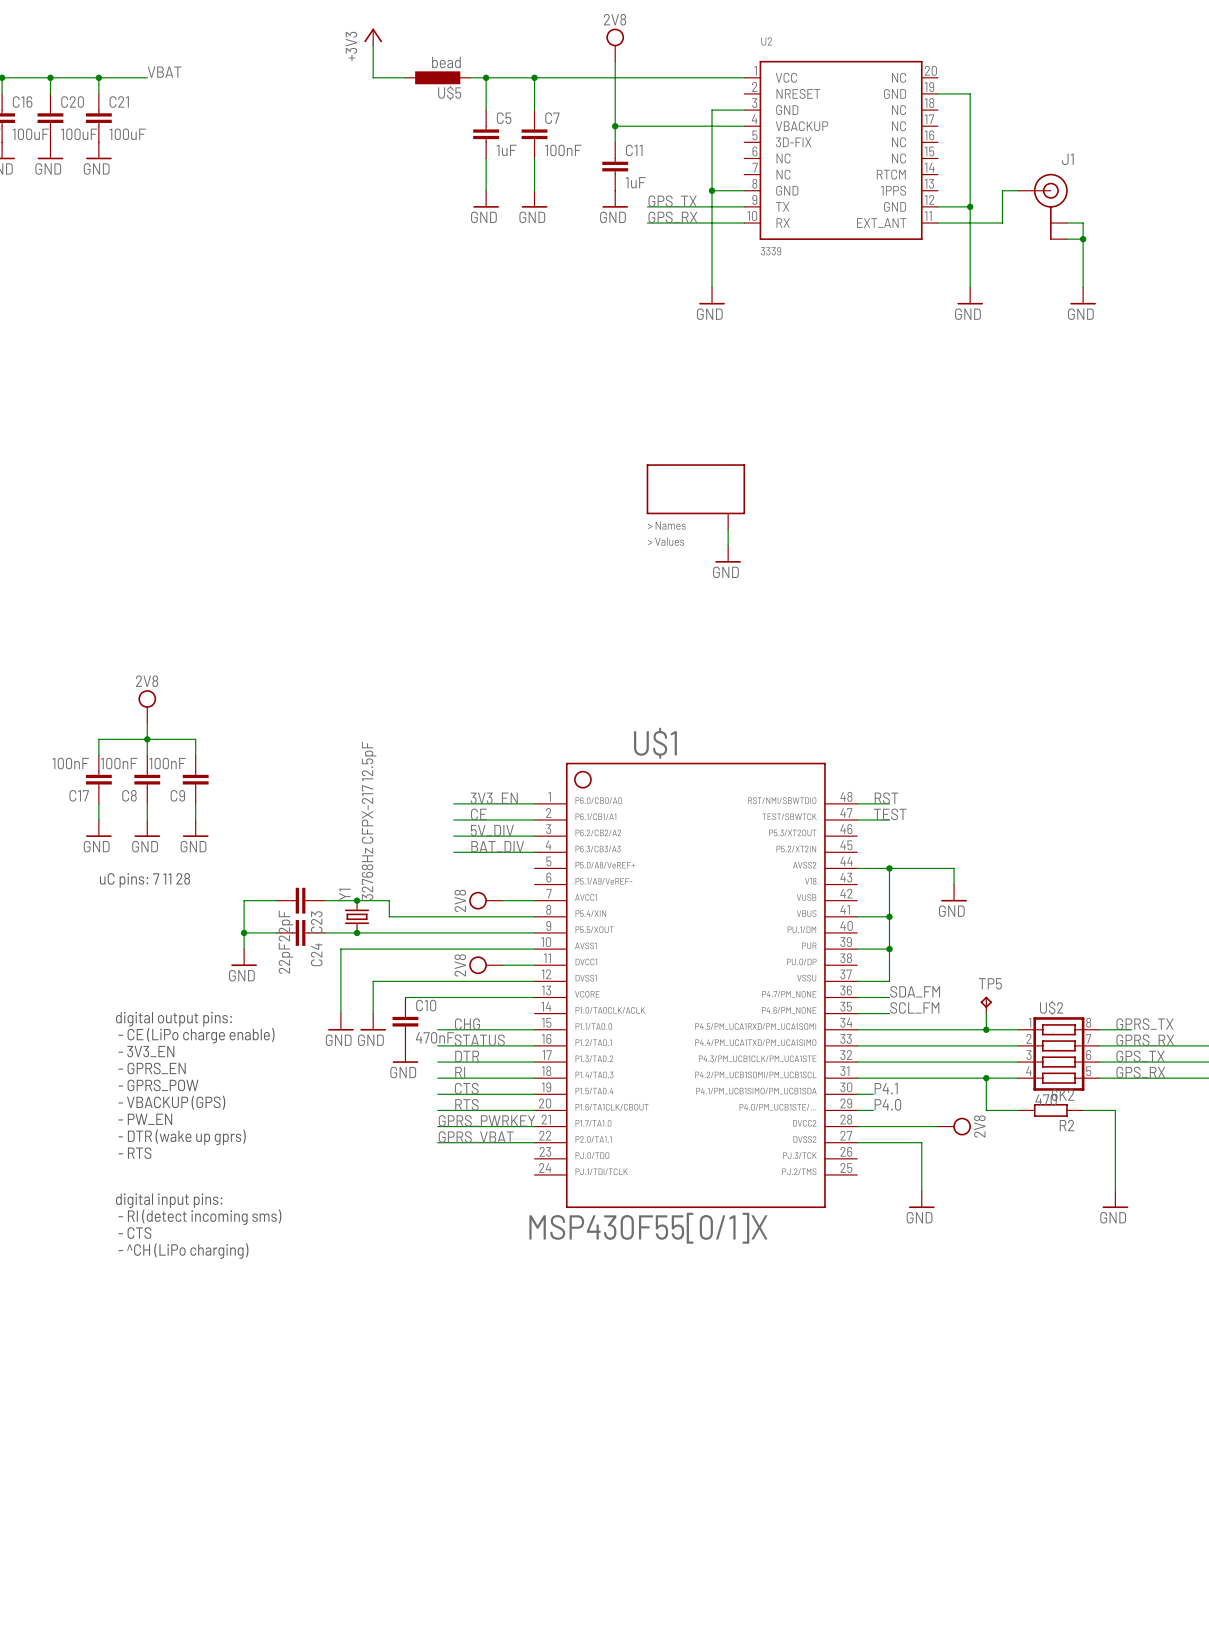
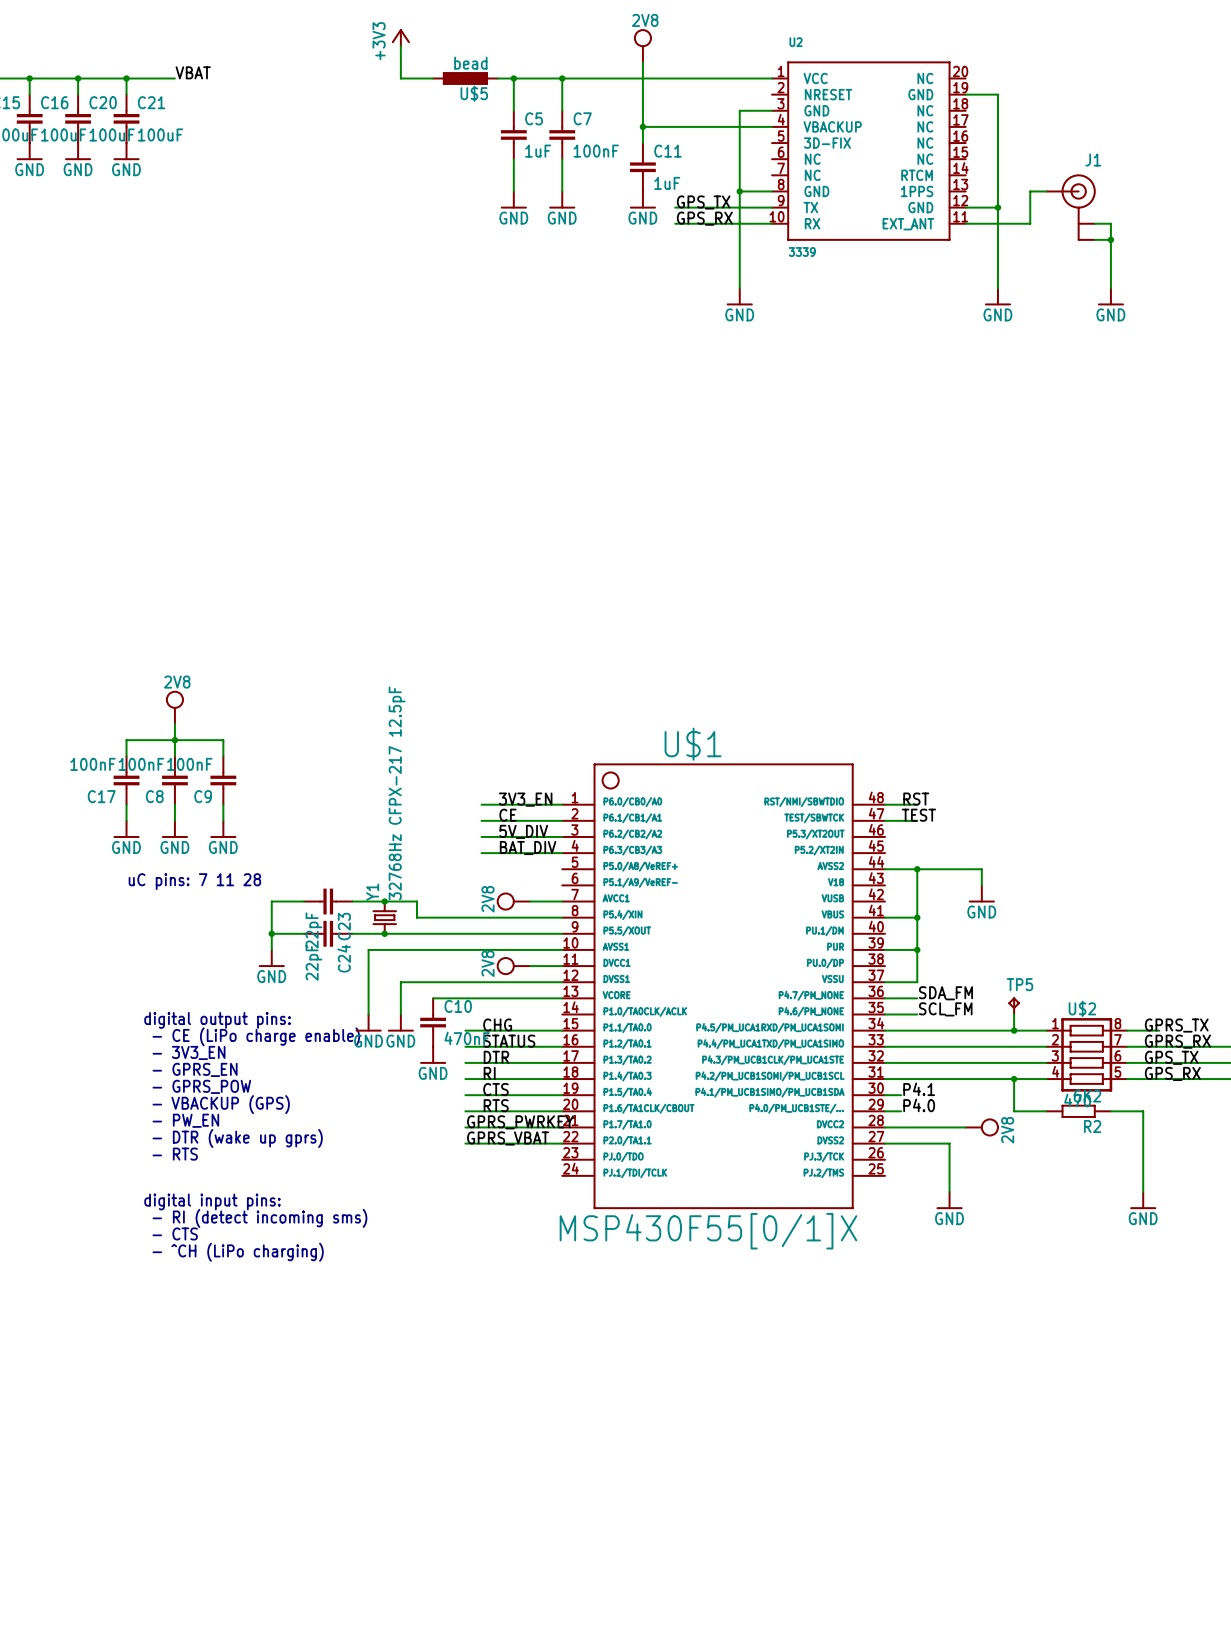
part: (695, 496) -> none
wire: (728, 529) (728, 545) -> none
power symbol: GND (728, 554) -> none

